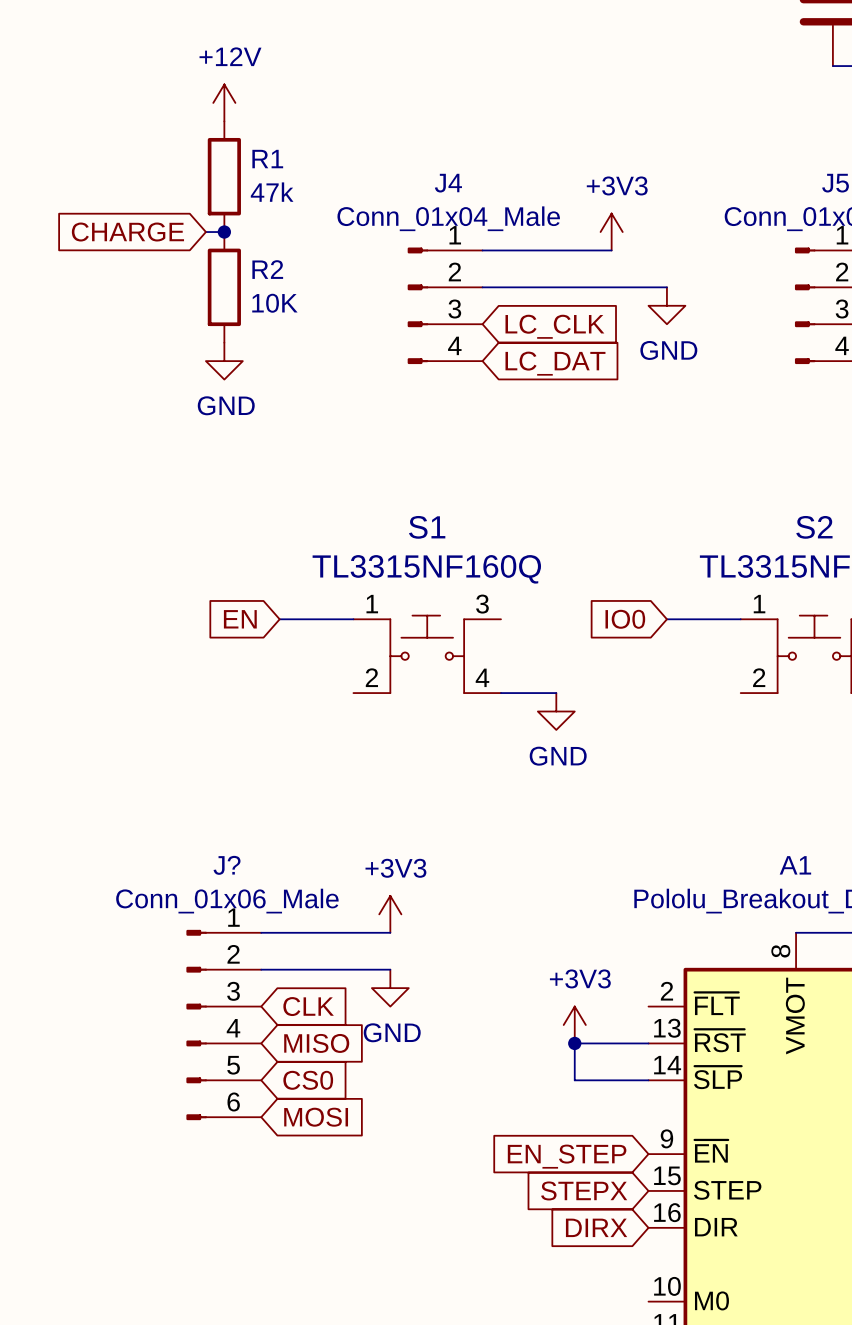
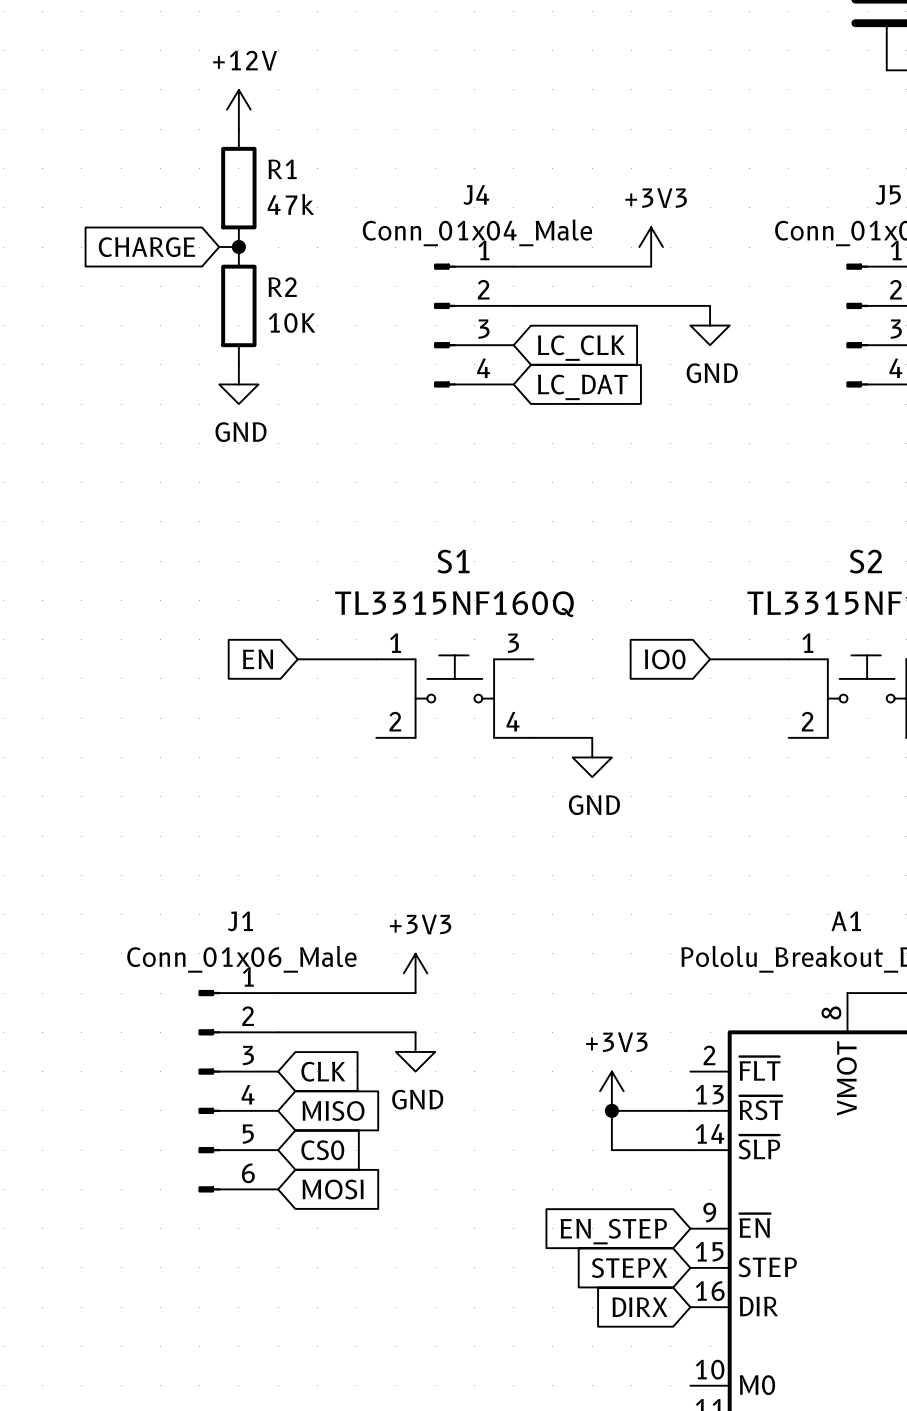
J? name: J? (227, 865) -> J1 (240, 921)

